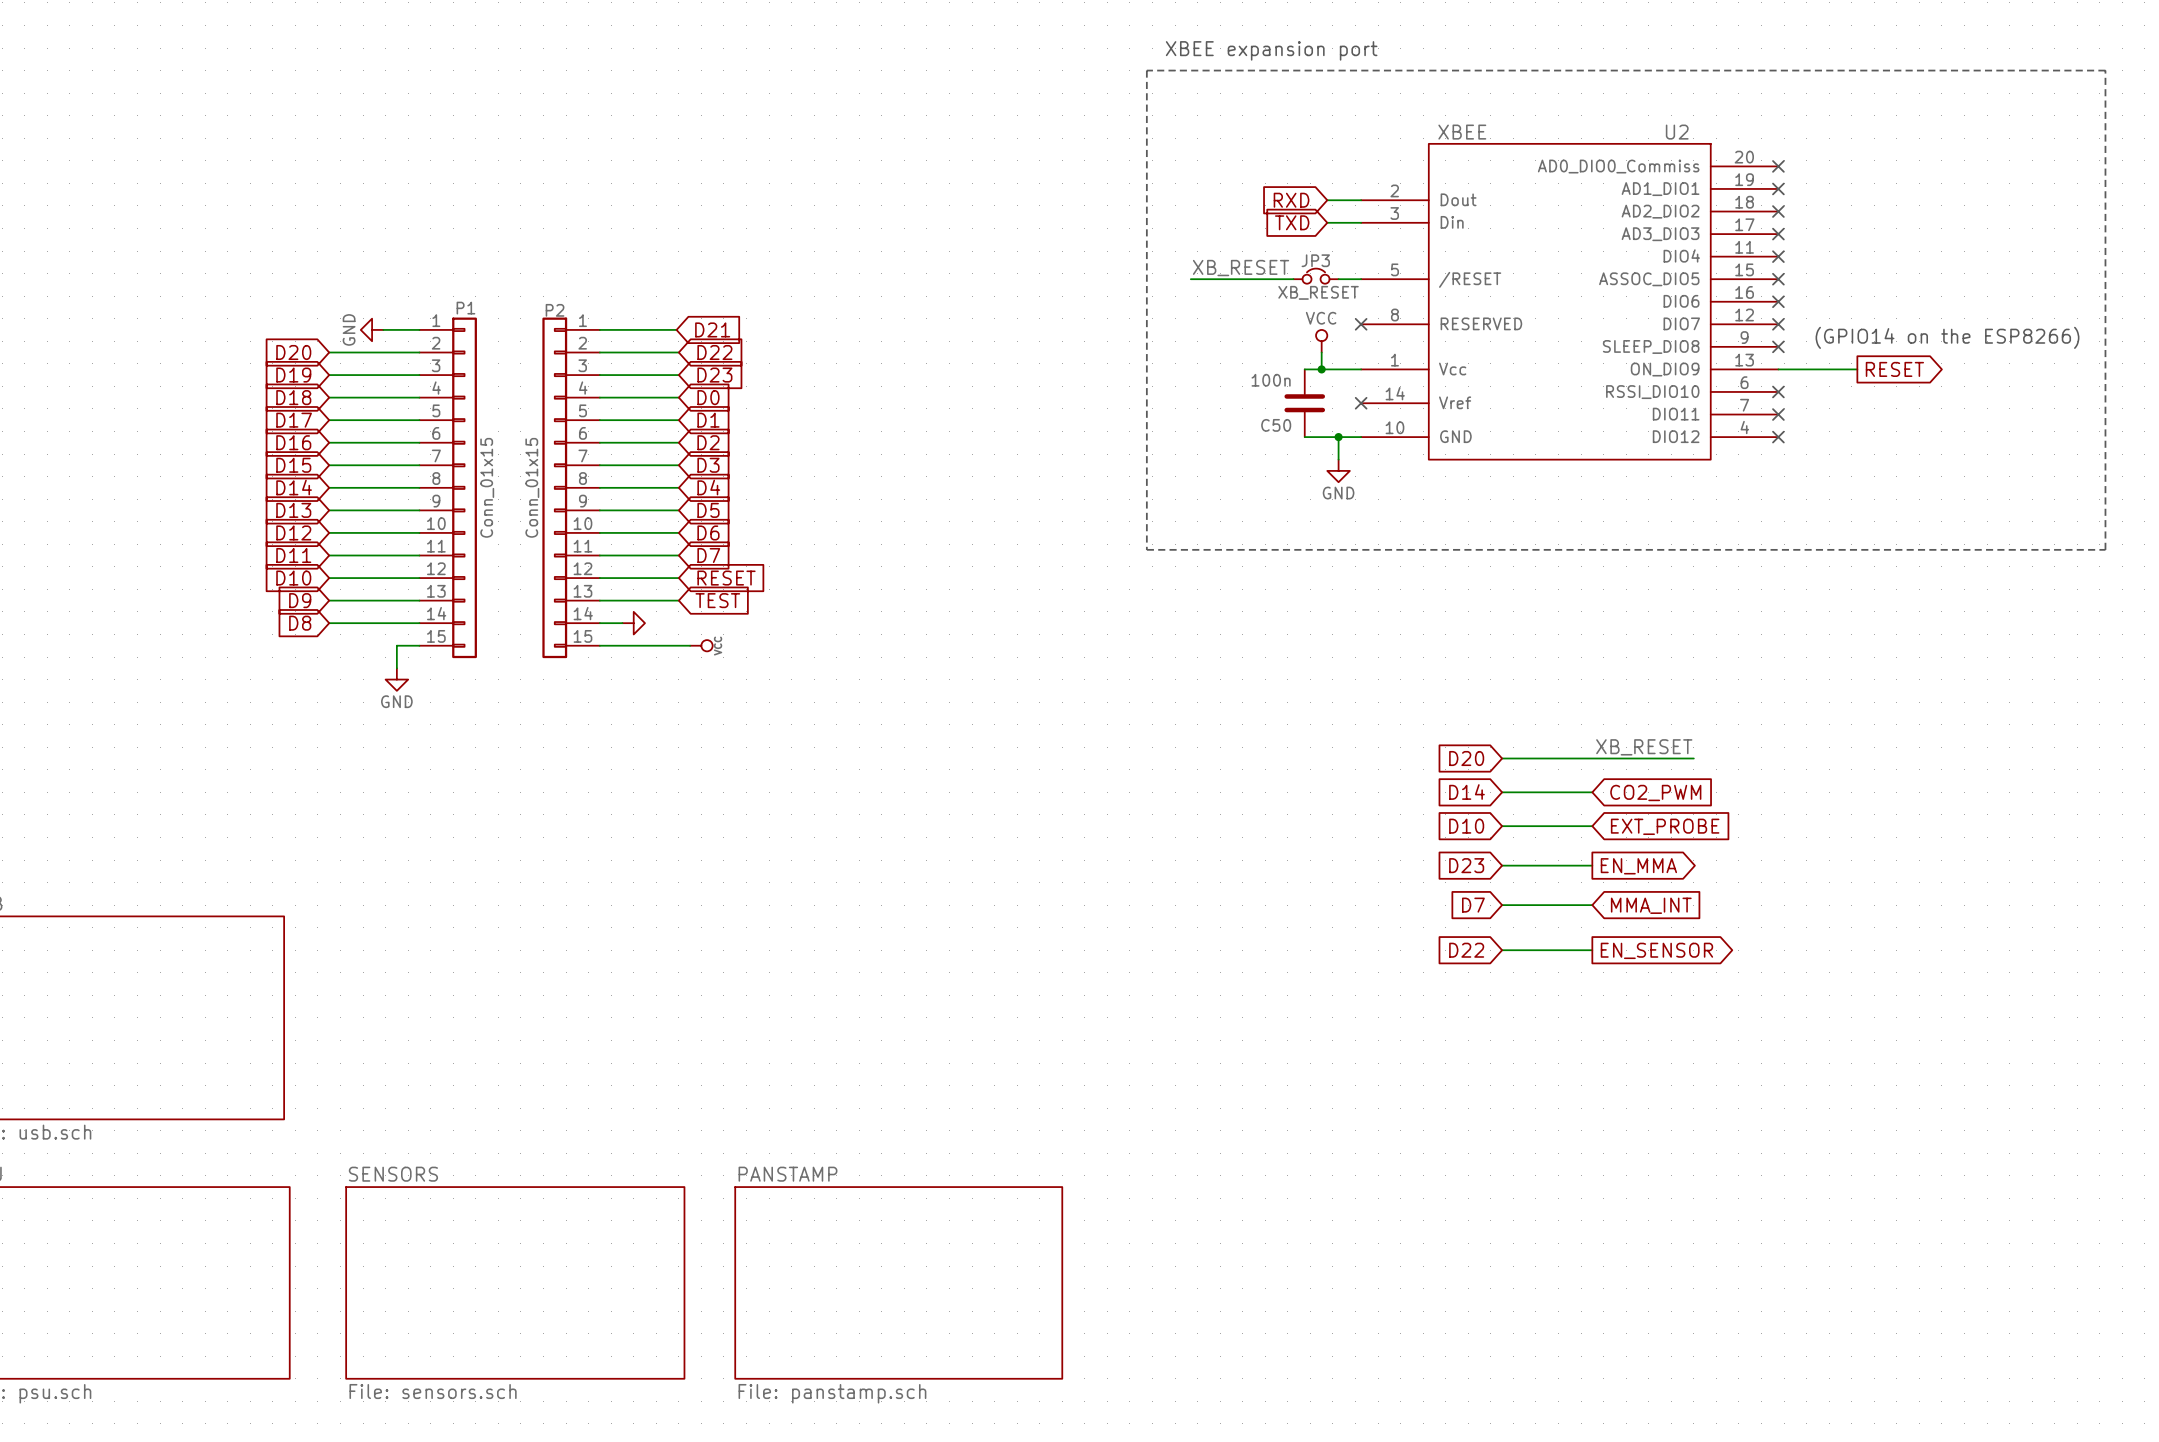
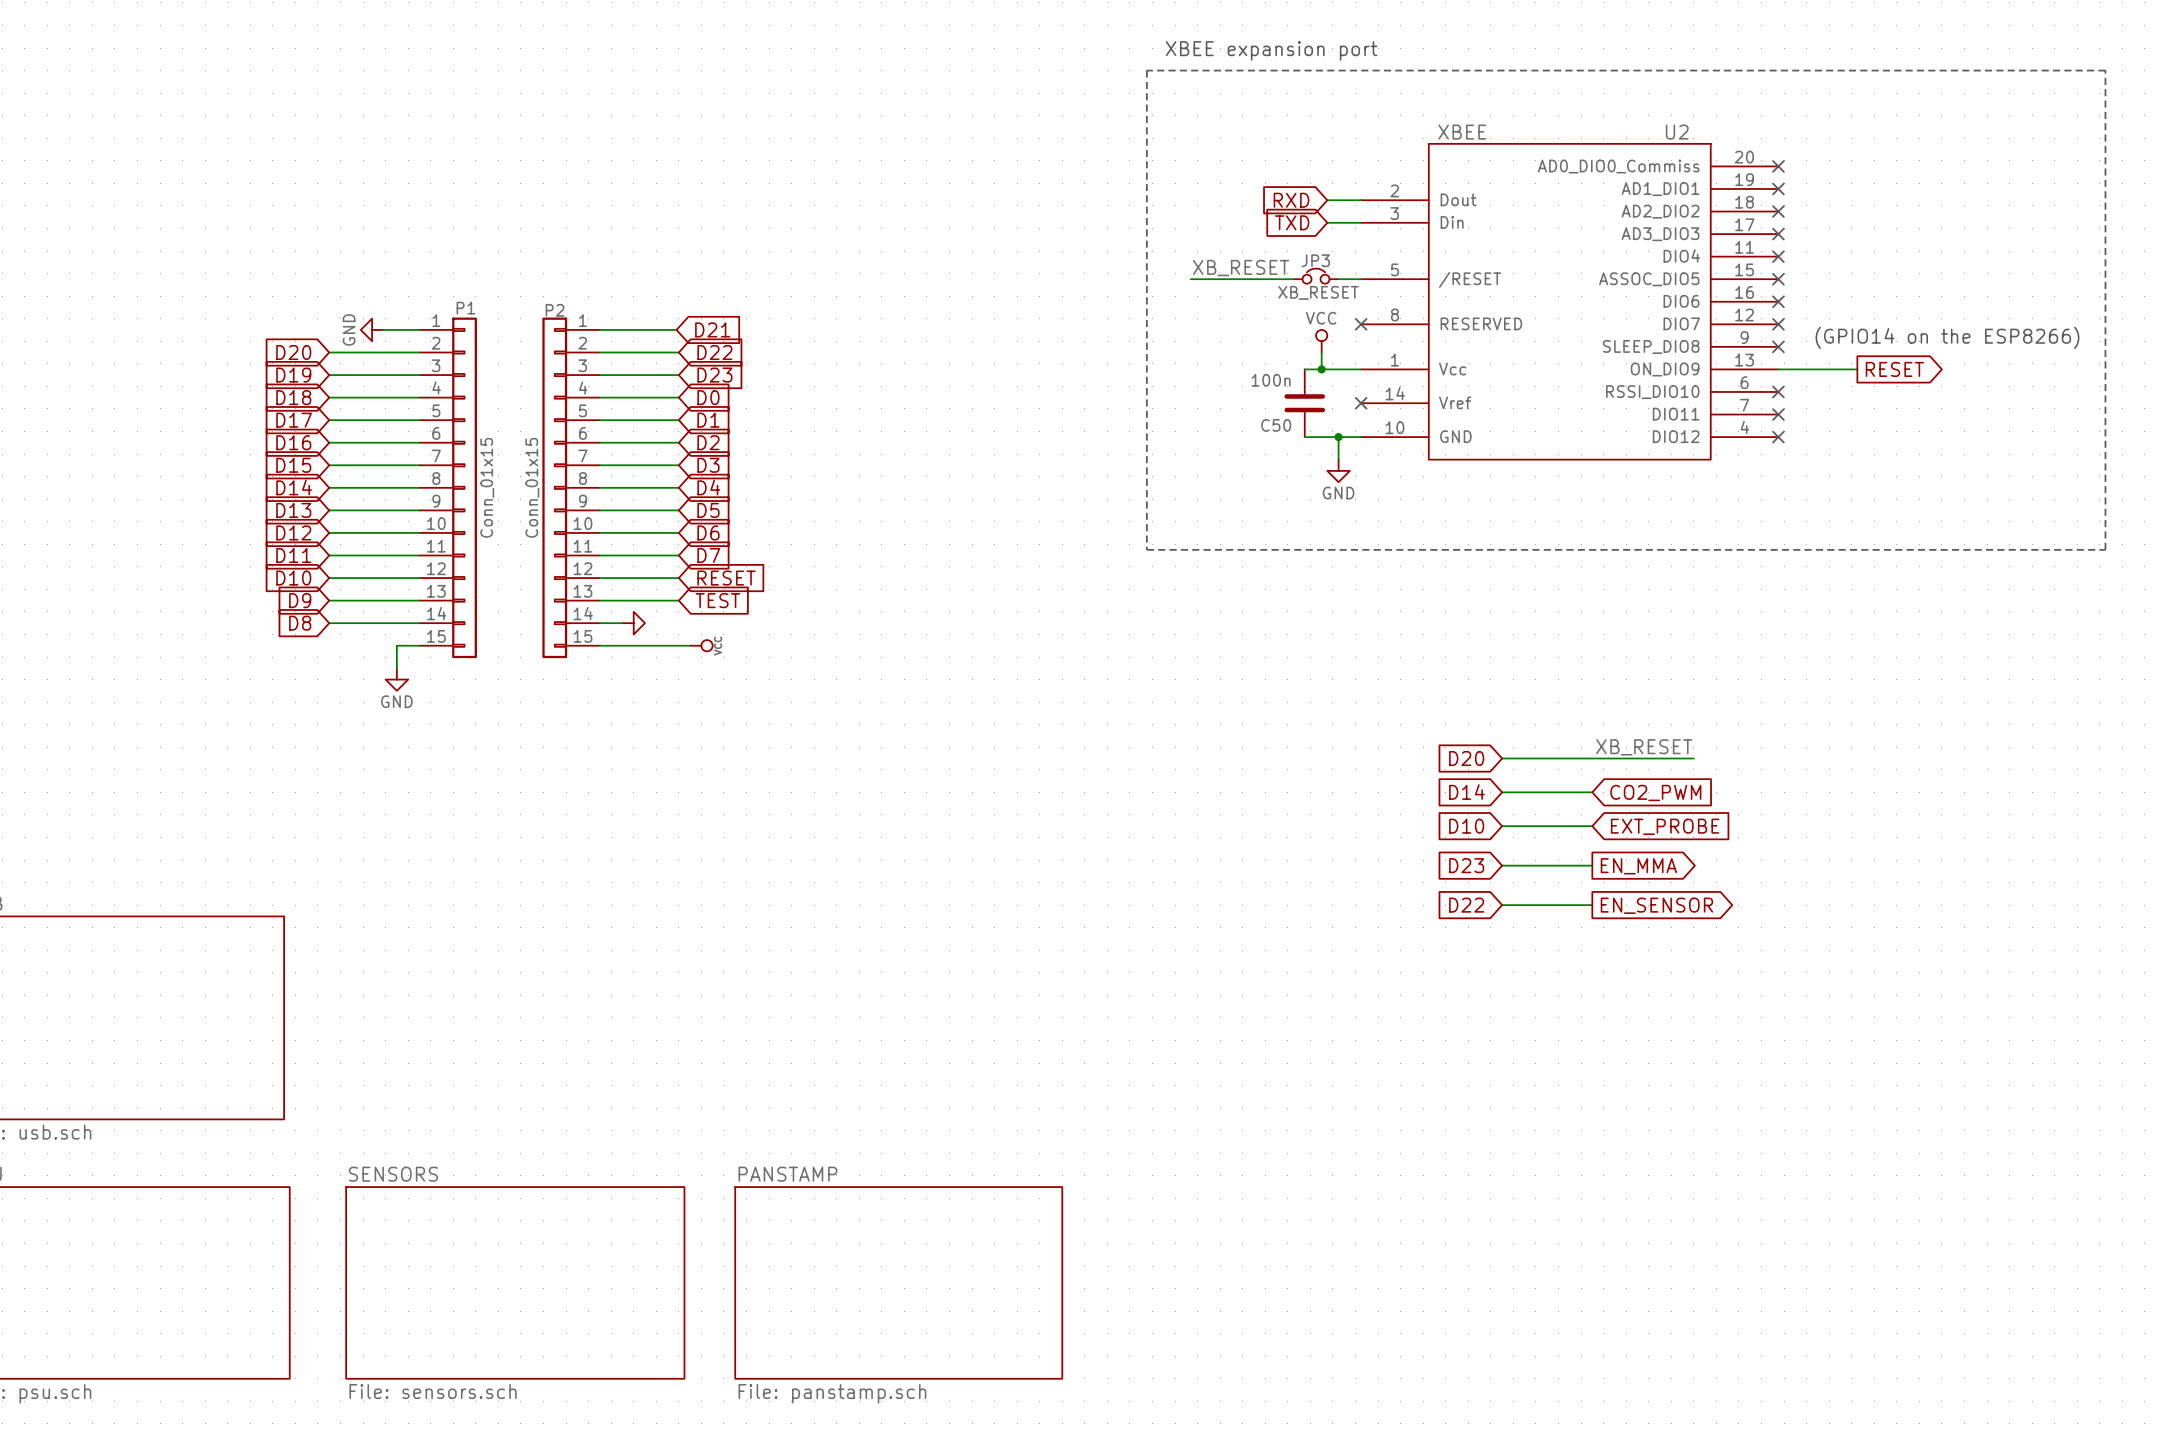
global label: D7 (1473, 905) -> D22 (1466, 905)
global label shape: input (1651, 905) -> output (1656, 905)
global label: MMA_INT (1651, 905) -> EN_SENSOR (1656, 905)
global label: D22 (1466, 950) -> none
wire: (1502, 950) (1592, 950) -> none
global label: EN_SENSOR (1656, 950) -> none

